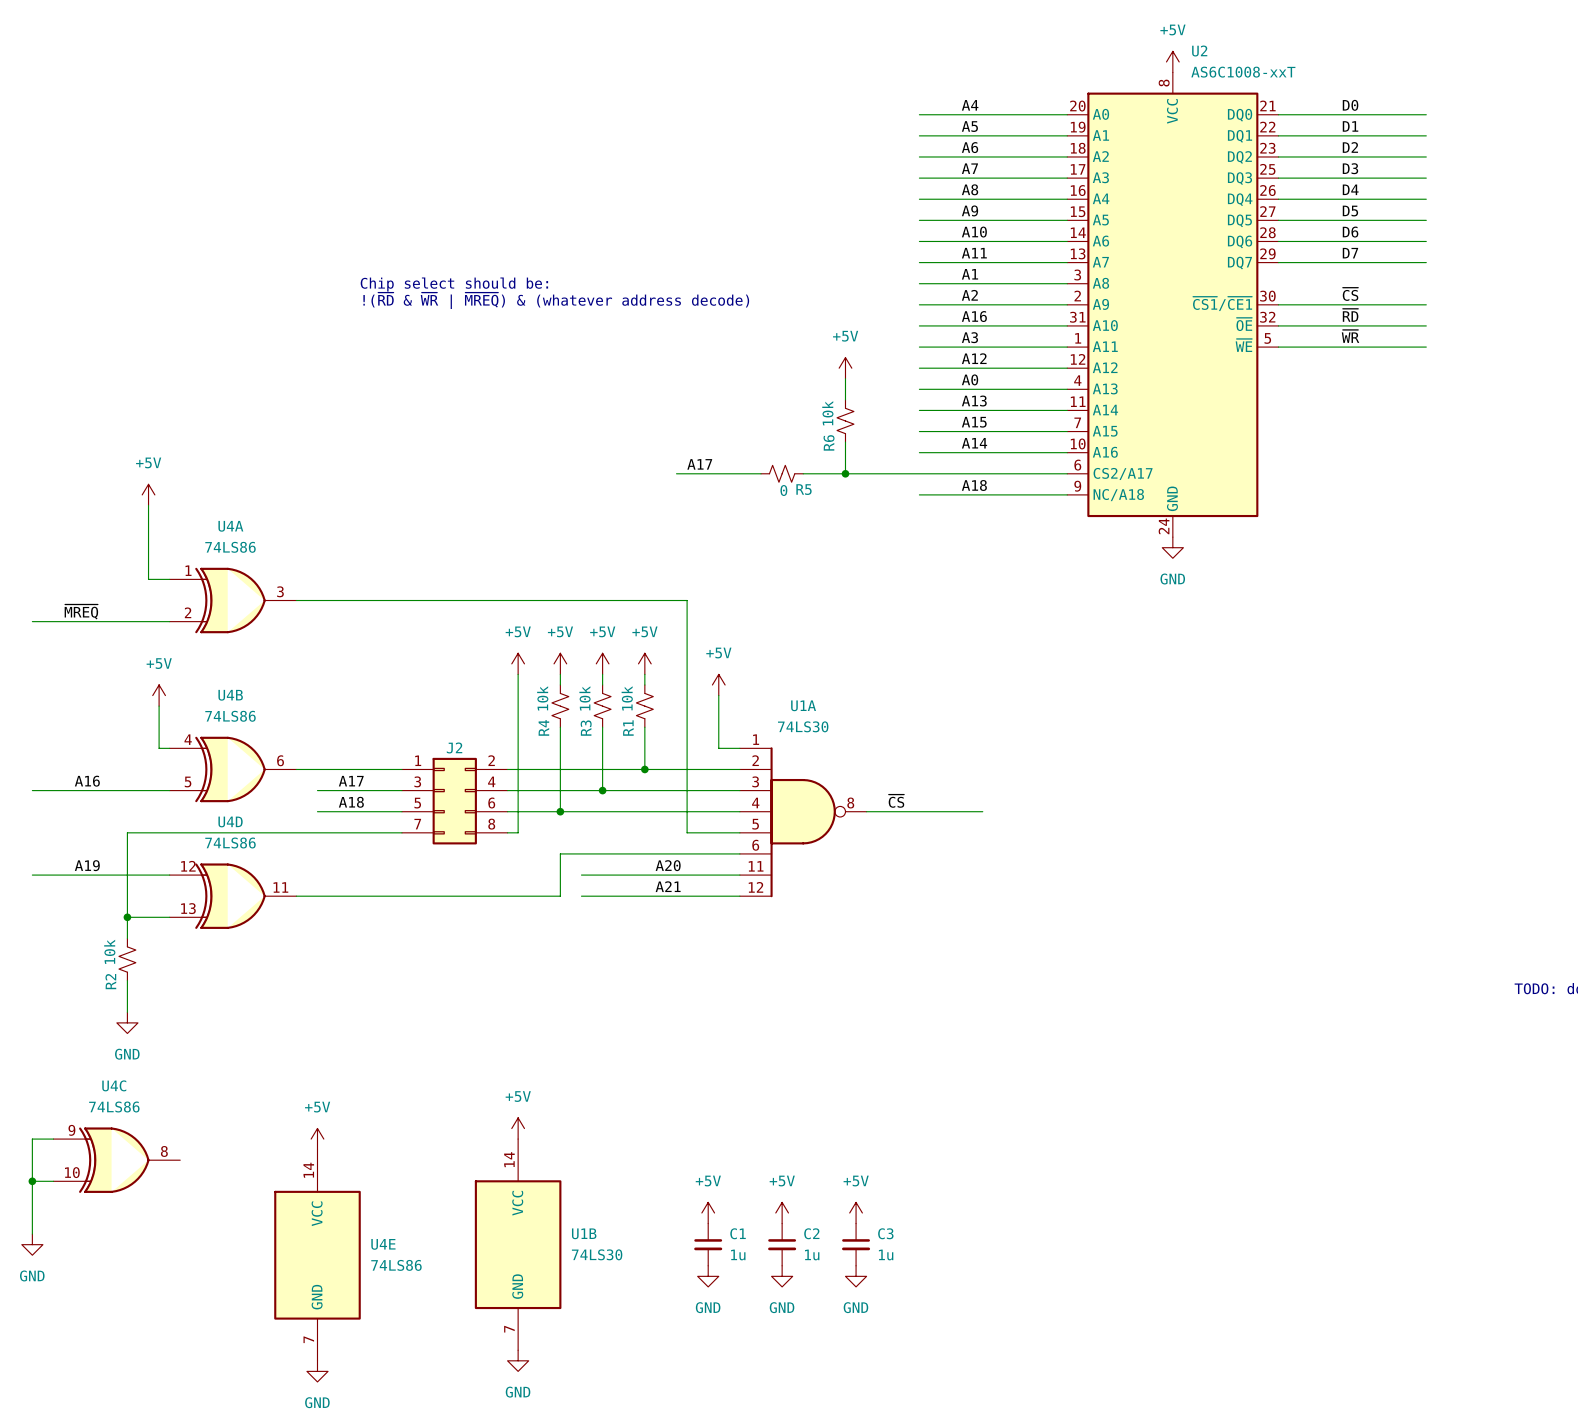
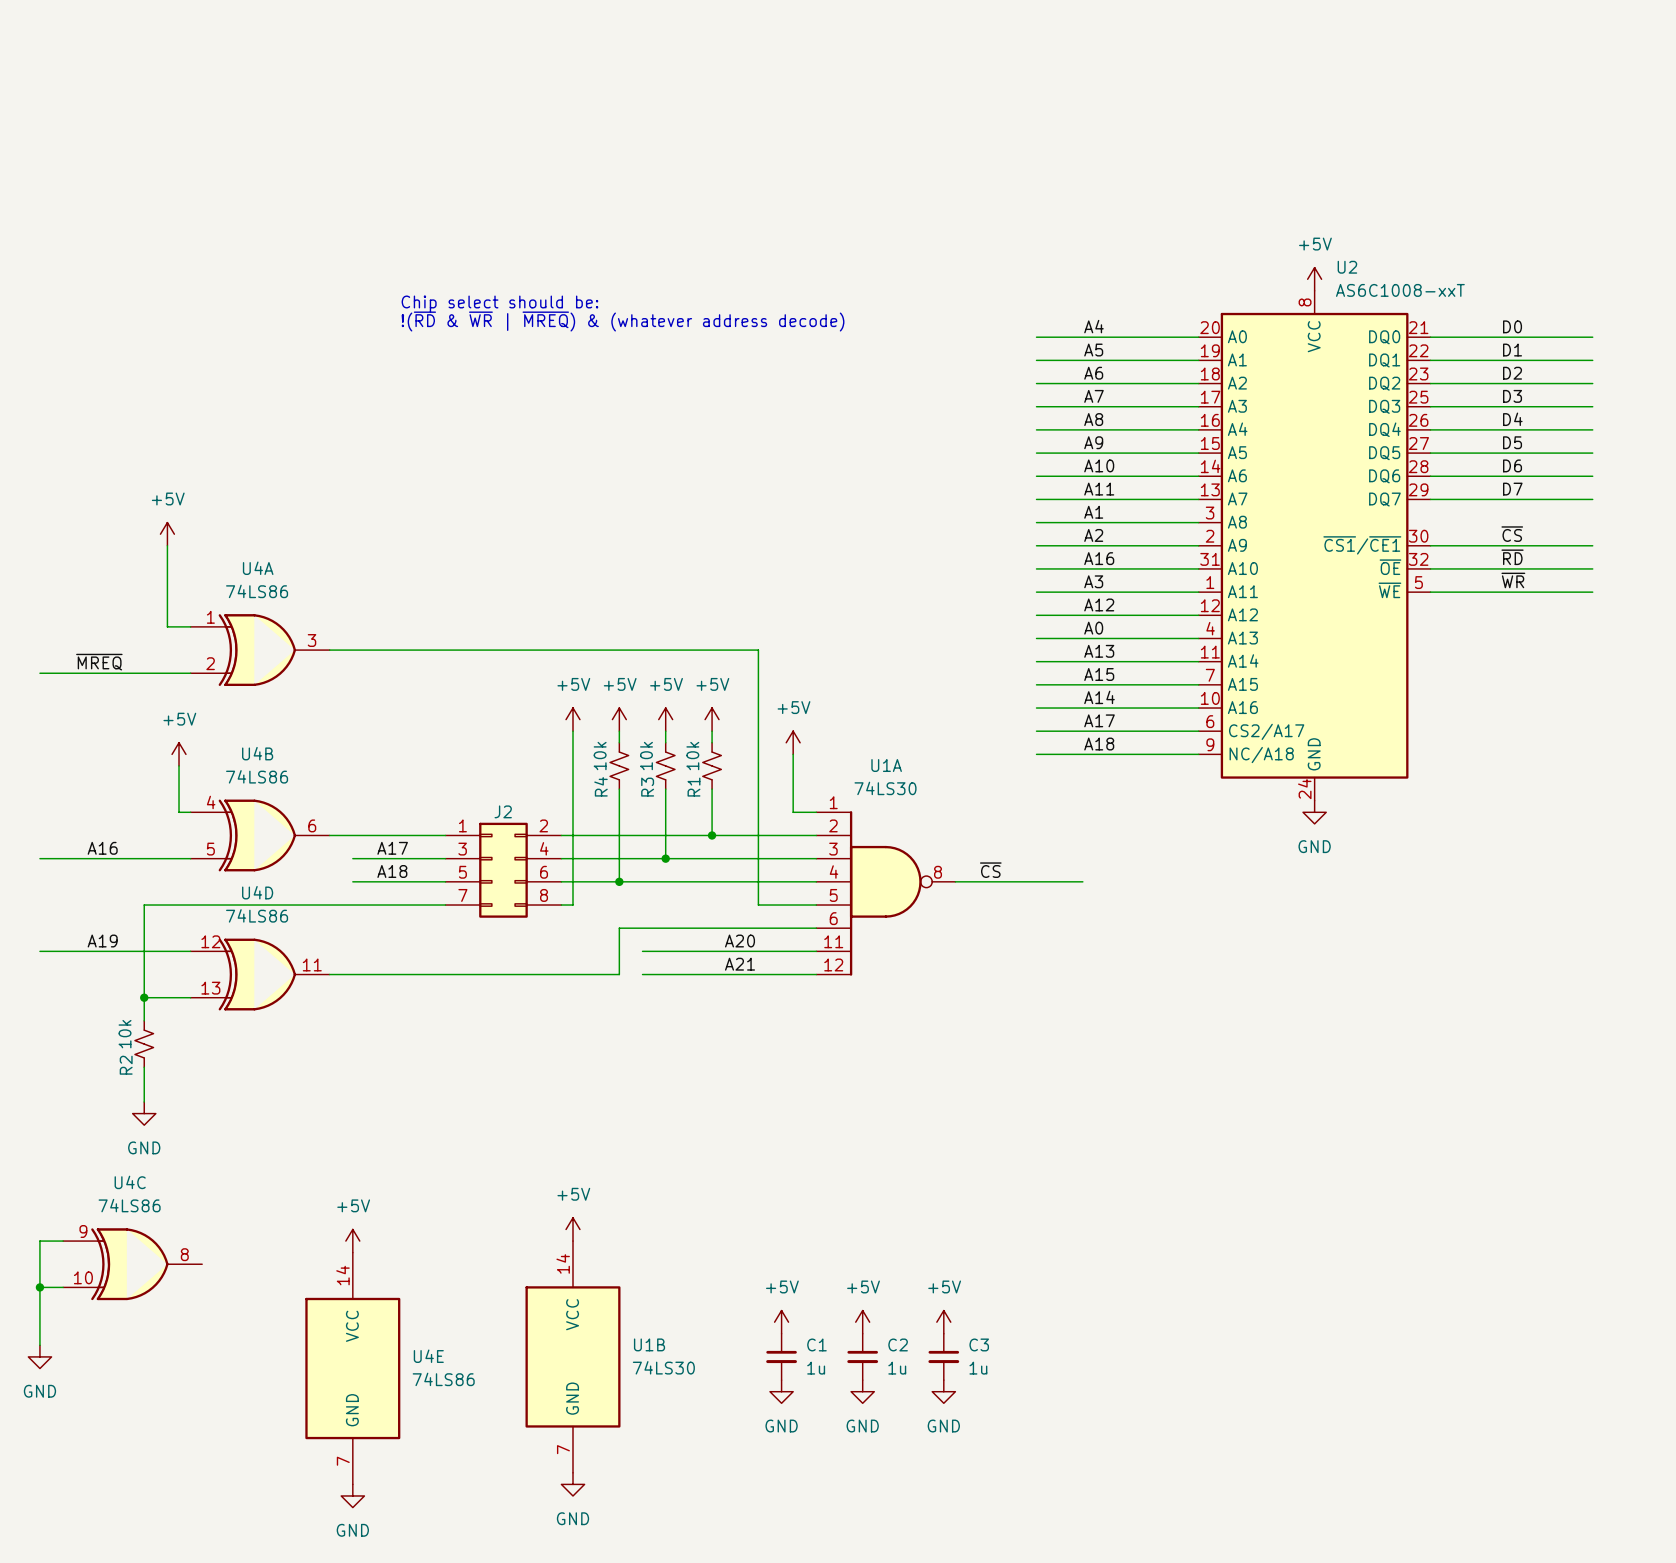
power symbol: +5V (1172, 61) -> none
label position: A4 (970, 105) -> A4 (1093, 326)
label position: D0 (1350, 105) -> D0 (1512, 326)
wire: (919, 114) (1067, 114) -> (1036, 337) (1198, 337)
wire: (1278, 114) (1426, 114) -> (1430, 337) (1592, 337)
label position: A5 (969, 126) -> A5 (1093, 350)
label position: D1 (1350, 126) -> D1 (1512, 350)
wire: (919, 135) (1067, 135) -> (1036, 360) (1198, 360)
wire: (1278, 135) (1426, 135) -> (1430, 360) (1592, 360)
label position: A6 (970, 147) -> A6 (1093, 373)
label position: D2 (1350, 147) -> D2 (1512, 373)
wire: (919, 156) (1067, 156) -> (1036, 383) (1198, 383)
wire: (1278, 156) (1426, 156) -> (1430, 383) (1592, 383)
label position: A7 (969, 168) -> A7 (1093, 396)
label position: D3 (1350, 168) -> D3 (1512, 396)
wire: (919, 178) (1067, 178) -> (1036, 406) (1198, 406)
wire: (1278, 178) (1426, 178) -> (1430, 406) (1592, 406)
label position: A8 (970, 189) -> A8 (1093, 419)
label position: D4 (1350, 189) -> D4 (1512, 419)
wire: (919, 199) (1067, 199) -> (1036, 429) (1198, 429)
wire: (1278, 199) (1426, 199) -> (1430, 429) (1592, 429)
label position: A9 (970, 210) -> A9 (1093, 442)
label position: D5 (1350, 211) -> D5 (1512, 442)
wire: (919, 220) (1067, 220) -> (1036, 453) (1198, 453)
wire: (1278, 220) (1426, 220) -> (1430, 453) (1592, 453)
label position: A10 (974, 232) -> A10 (1099, 465)
label position: D6 (1350, 232) -> D6 (1512, 465)
wire: (919, 241) (1067, 241) -> (1036, 476) (1198, 476)
wire: (1278, 241) (1426, 241) -> (1430, 476) (1592, 476)
label position: A11 (974, 253) -> A11 (1099, 489)
label position: D7 (1350, 253) -> D7 (1512, 489)
wire: (919, 262) (1067, 262) -> (1036, 499) (1198, 499)
power symbol: none -> +5V (1314, 279)
wire: (1278, 262) (1426, 262) -> (1430, 499) (1592, 499)
label position: A1 (970, 274) -> A1 (1093, 512)
wire: (919, 283) (1067, 283) -> (1036, 522) (1198, 522)
label position: ~{CS} (1350, 294) -> ~{CS} (1512, 534)
label position: A2 (969, 295) -> A2 (1093, 535)
wire: (919, 304) (1067, 304) -> (1036, 545) (1198, 545)
U2 position: (1172, 304) -> (1314, 545)
wire: (1278, 304) (1426, 304) -> (1430, 545) (1592, 545)
label position: ~{RD} (1350, 315) -> ~{RD} (1512, 557)
label position: A16 (974, 316) -> A16 (1099, 558)
wire: (919, 325) (1067, 325) -> (1036, 568) (1198, 568)
wire: (1278, 325) (1426, 325) -> (1430, 568) (1592, 568)
label position: ~{WR} (1350, 336) -> ~{WR} (1513, 580)
label position: A3 (969, 337) -> A3 (1093, 581)
wire: (919, 347) (1067, 347) -> (1036, 592) (1198, 592)
wire: (1278, 347) (1426, 347) -> (1430, 592) (1592, 592)
label position: A12 (974, 358) -> A12 (1099, 604)
power symbol: +5V (845, 368) -> none
wire: (919, 368) (1067, 368) -> (1036, 615) (1198, 615)
wire: (845, 378) (845, 399) -> none
label position: A0 (970, 379) -> A0 (1093, 628)
wire: (919, 389) (1067, 389) -> (1036, 638) (1198, 638)
label position: A13 (974, 401) -> A13 (1099, 651)
wire: (919, 410) (1067, 410) -> (1036, 661) (1198, 661)
R6: 10k (845, 420) -> none
label position: A15 (974, 422) -> A15 (1099, 674)
wire: (919, 431) (1067, 431) -> (1036, 684) (1198, 684)
wire: (845, 442) (845, 473) -> none
label position: A14 (974, 443) -> A14 (1099, 697)
wire: (919, 452) (1067, 452) -> (1036, 708) (1198, 708)
label: A17 (699, 464) -> none
wire: (676, 473) (761, 473) -> none
R5: 0 (782, 473) -> none
wire: (803, 473) (1067, 473) -> none
junction: (845, 473) -> none
label position: A18 (974, 485) -> A18 (1099, 744)
wire: (919, 494) (1067, 494) -> (1036, 754) (1198, 754)
power symbol position: GND (1172, 547) -> GND (1314, 812)
label: none -> A17 (1099, 720)
wire: none -> (1036, 731) (1198, 731)

